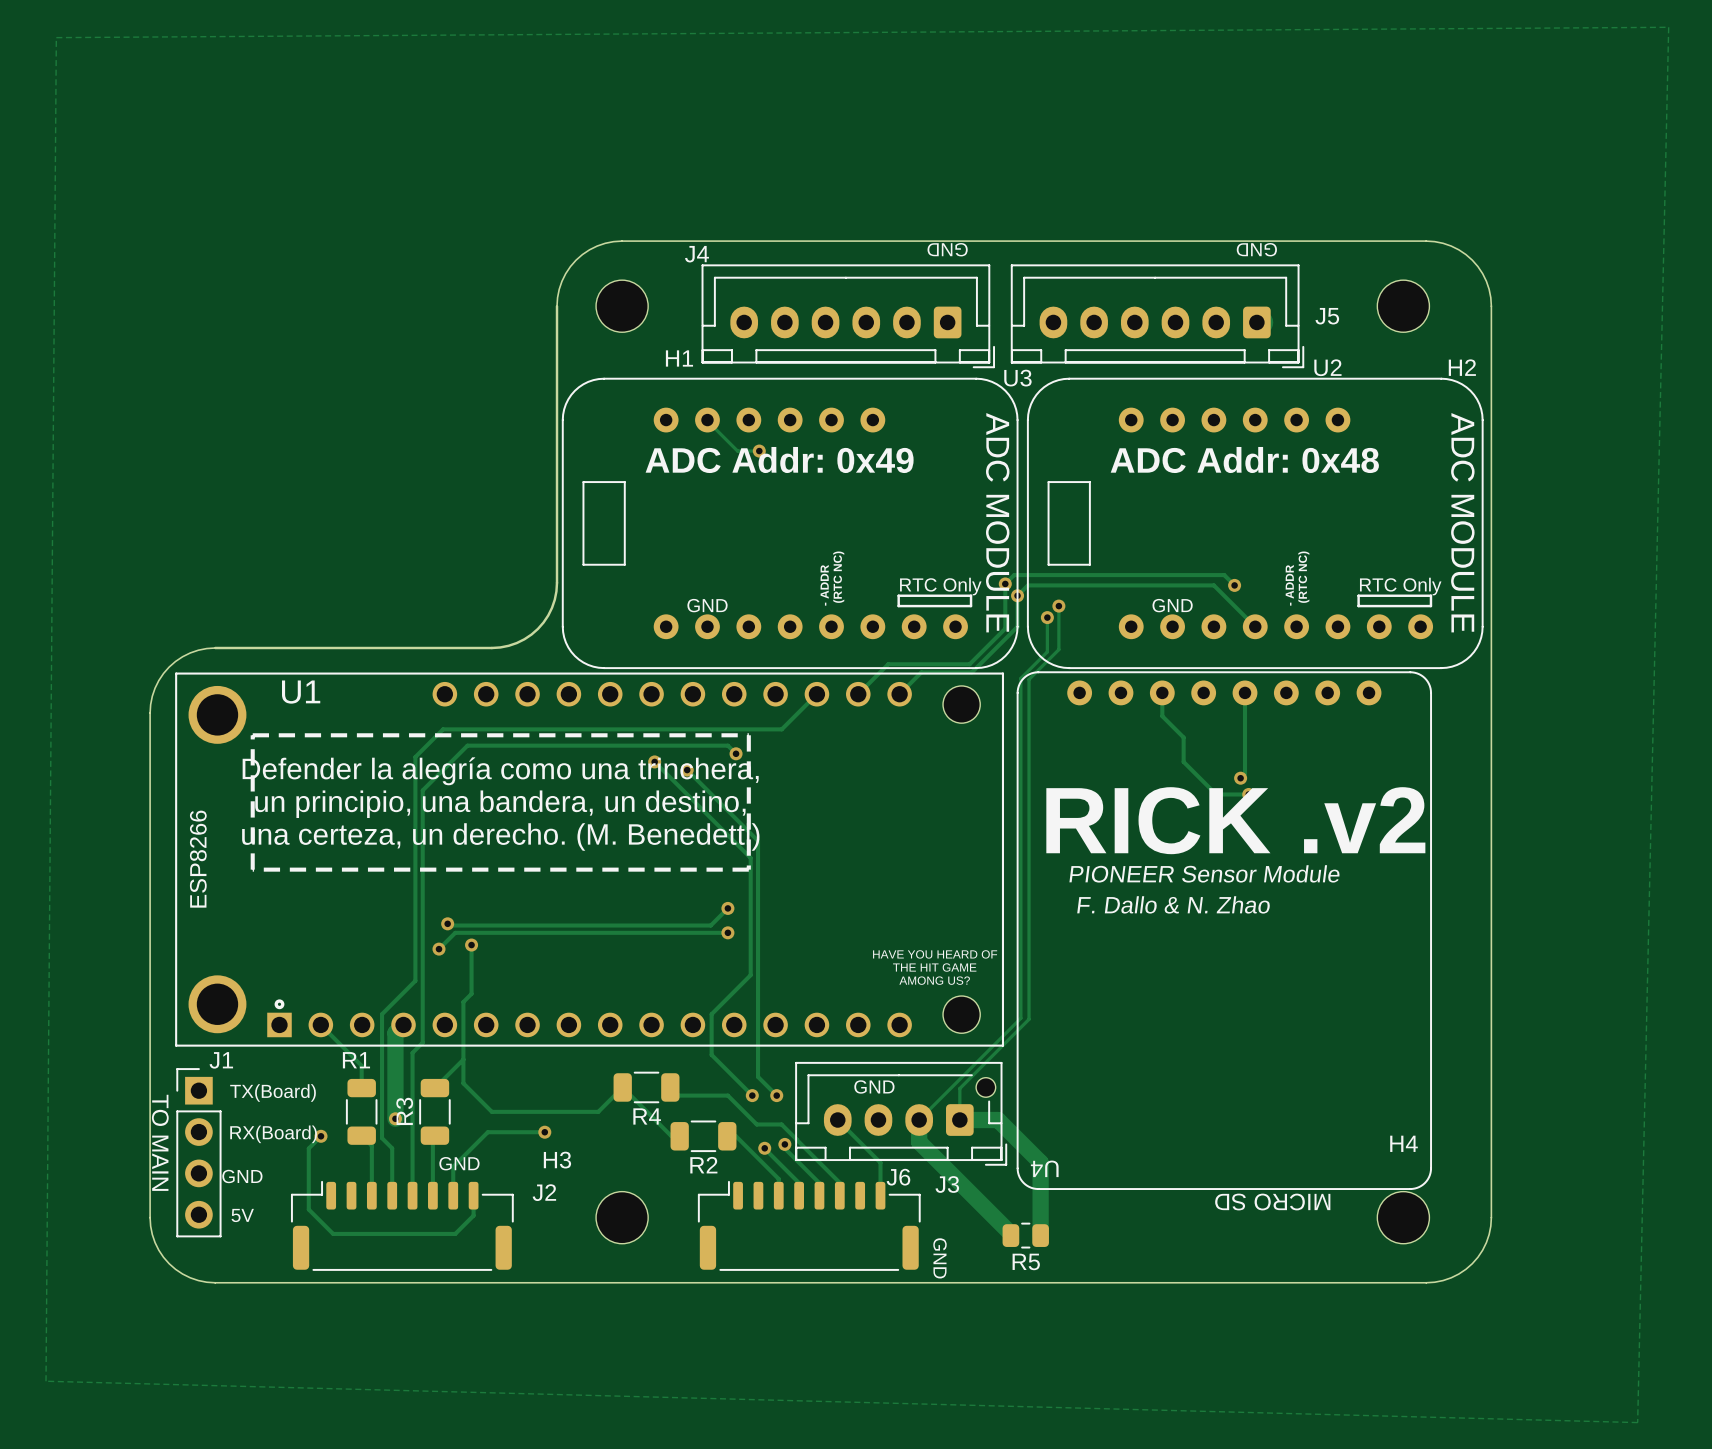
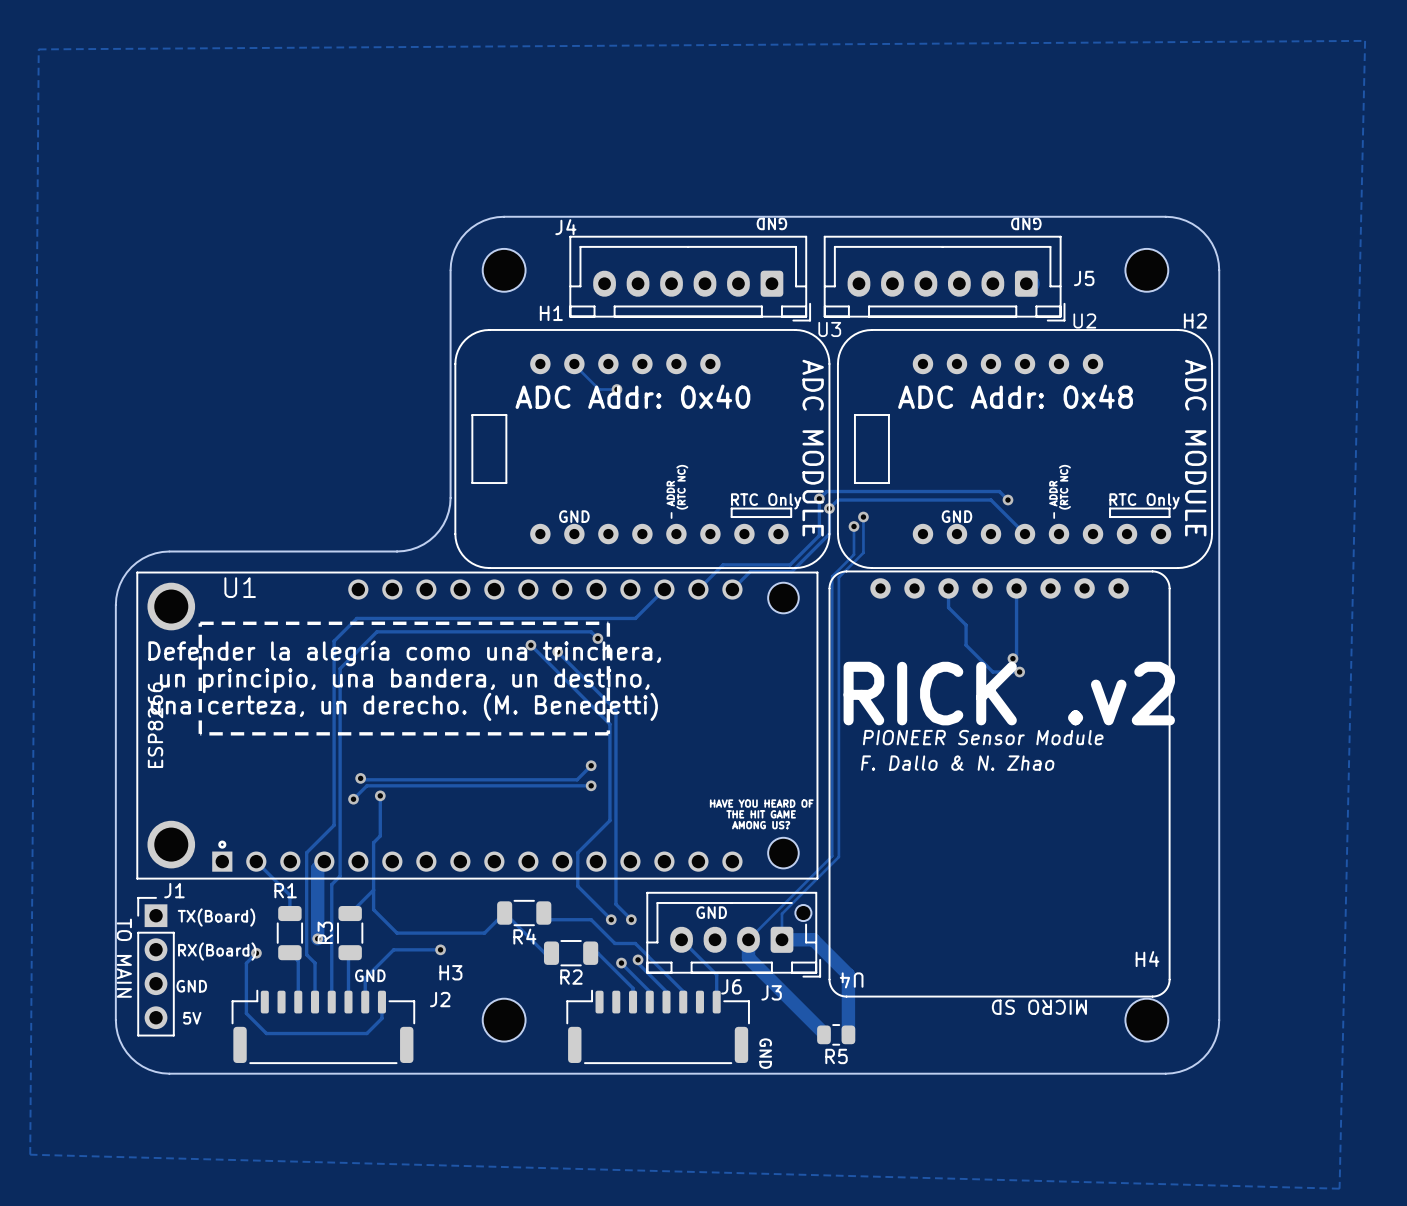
text: ADC Addr: 0x49 (779, 460) -> ADC Addr: 0x40 (632, 396)

